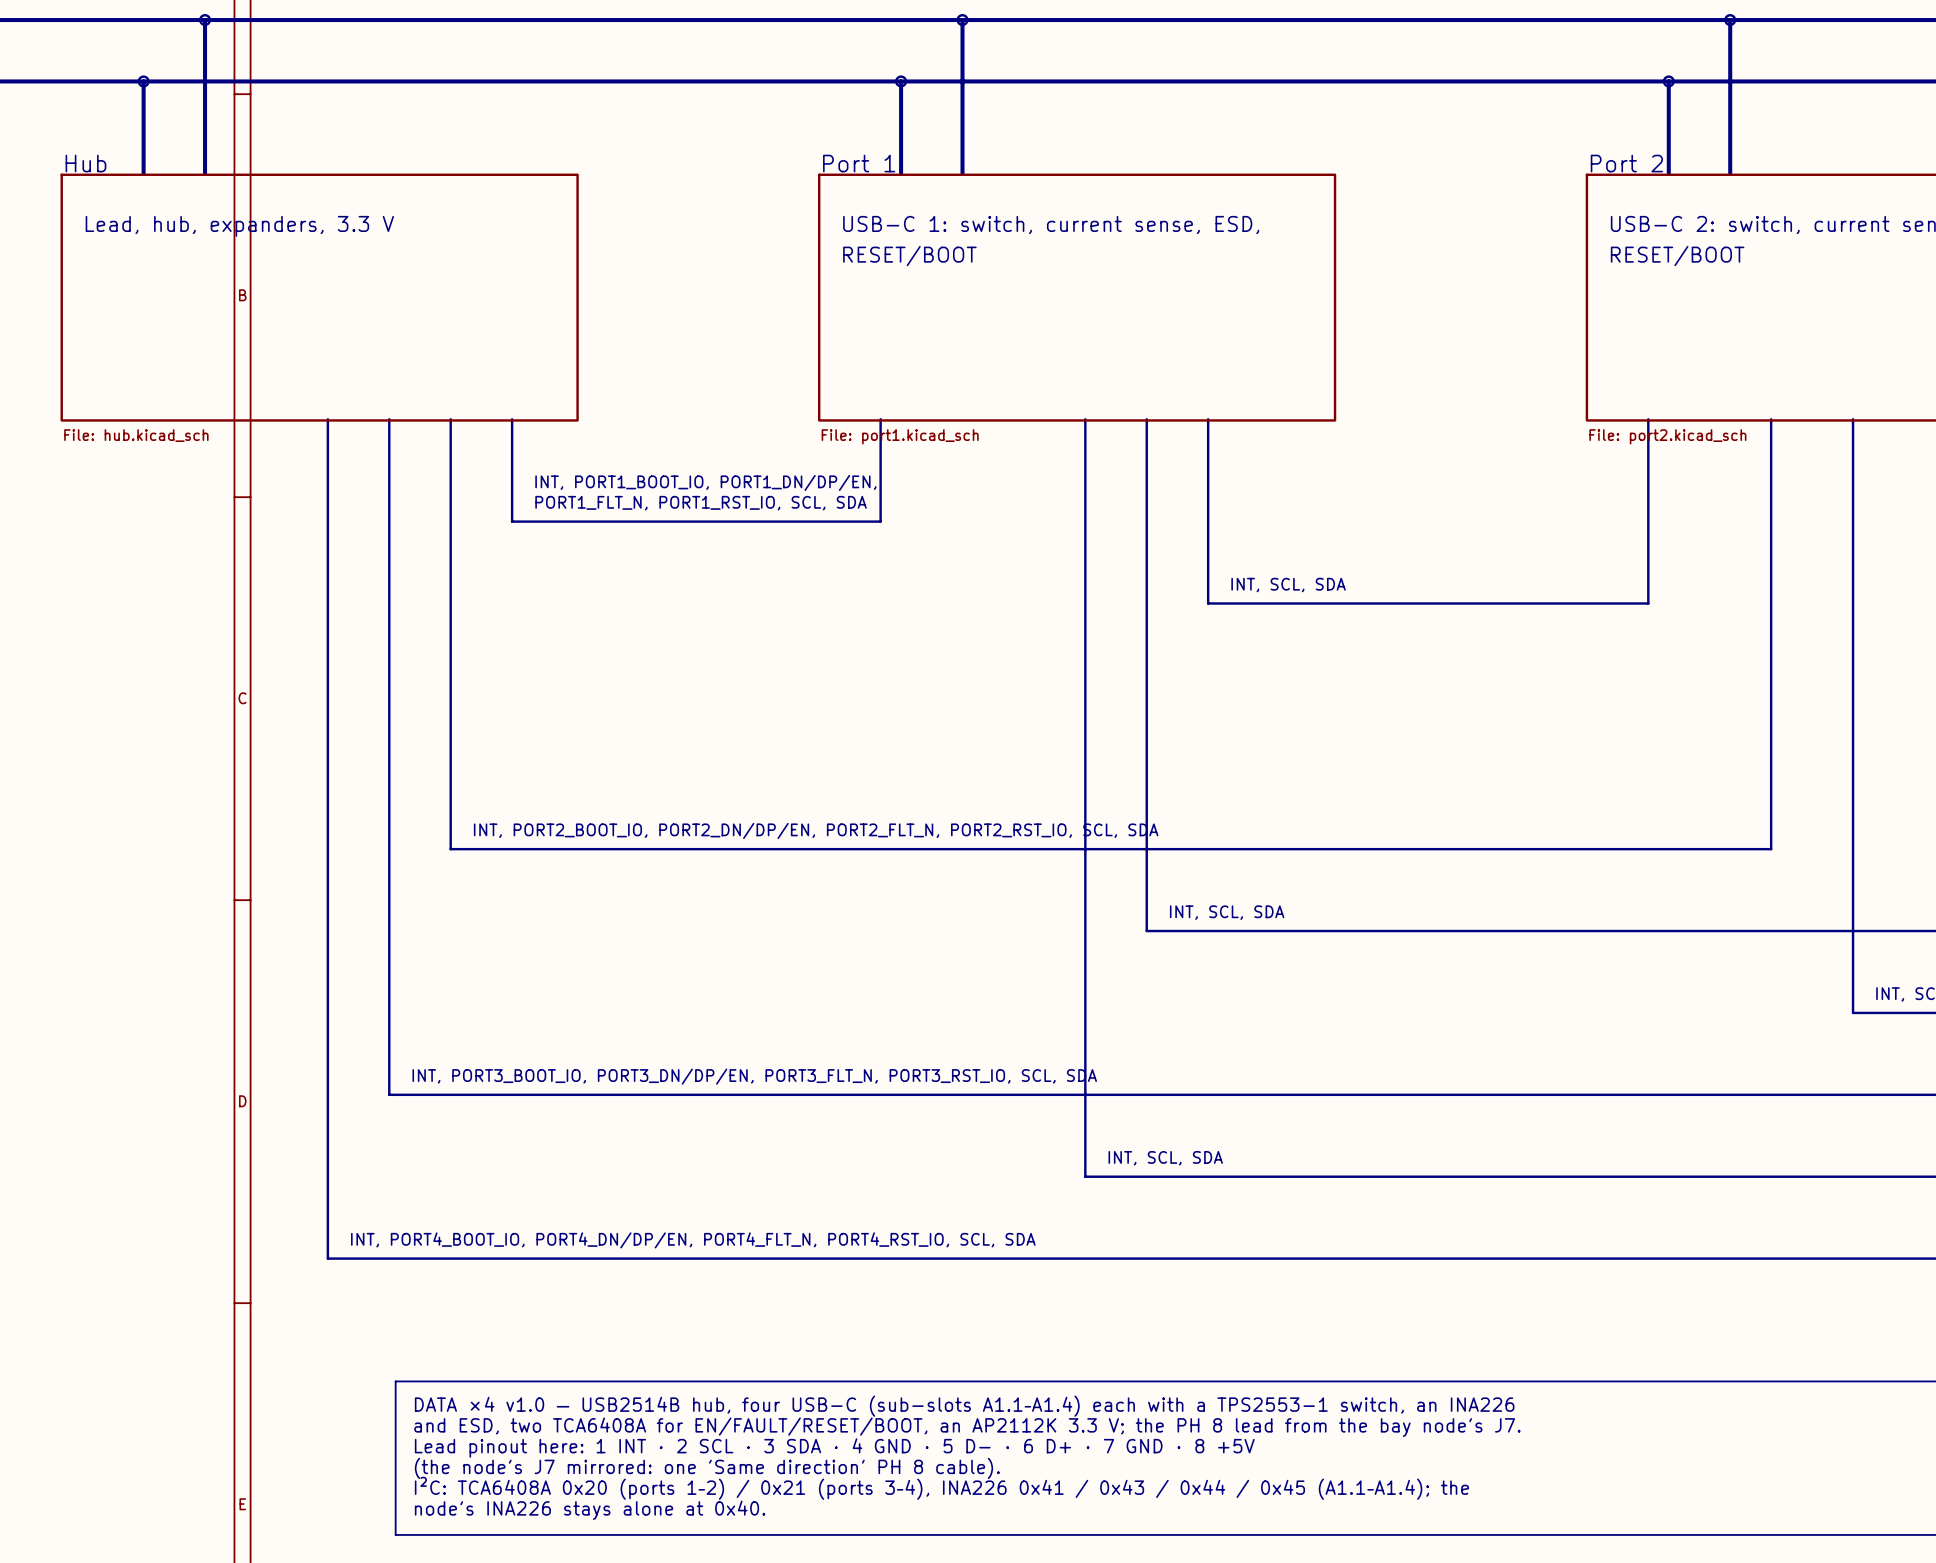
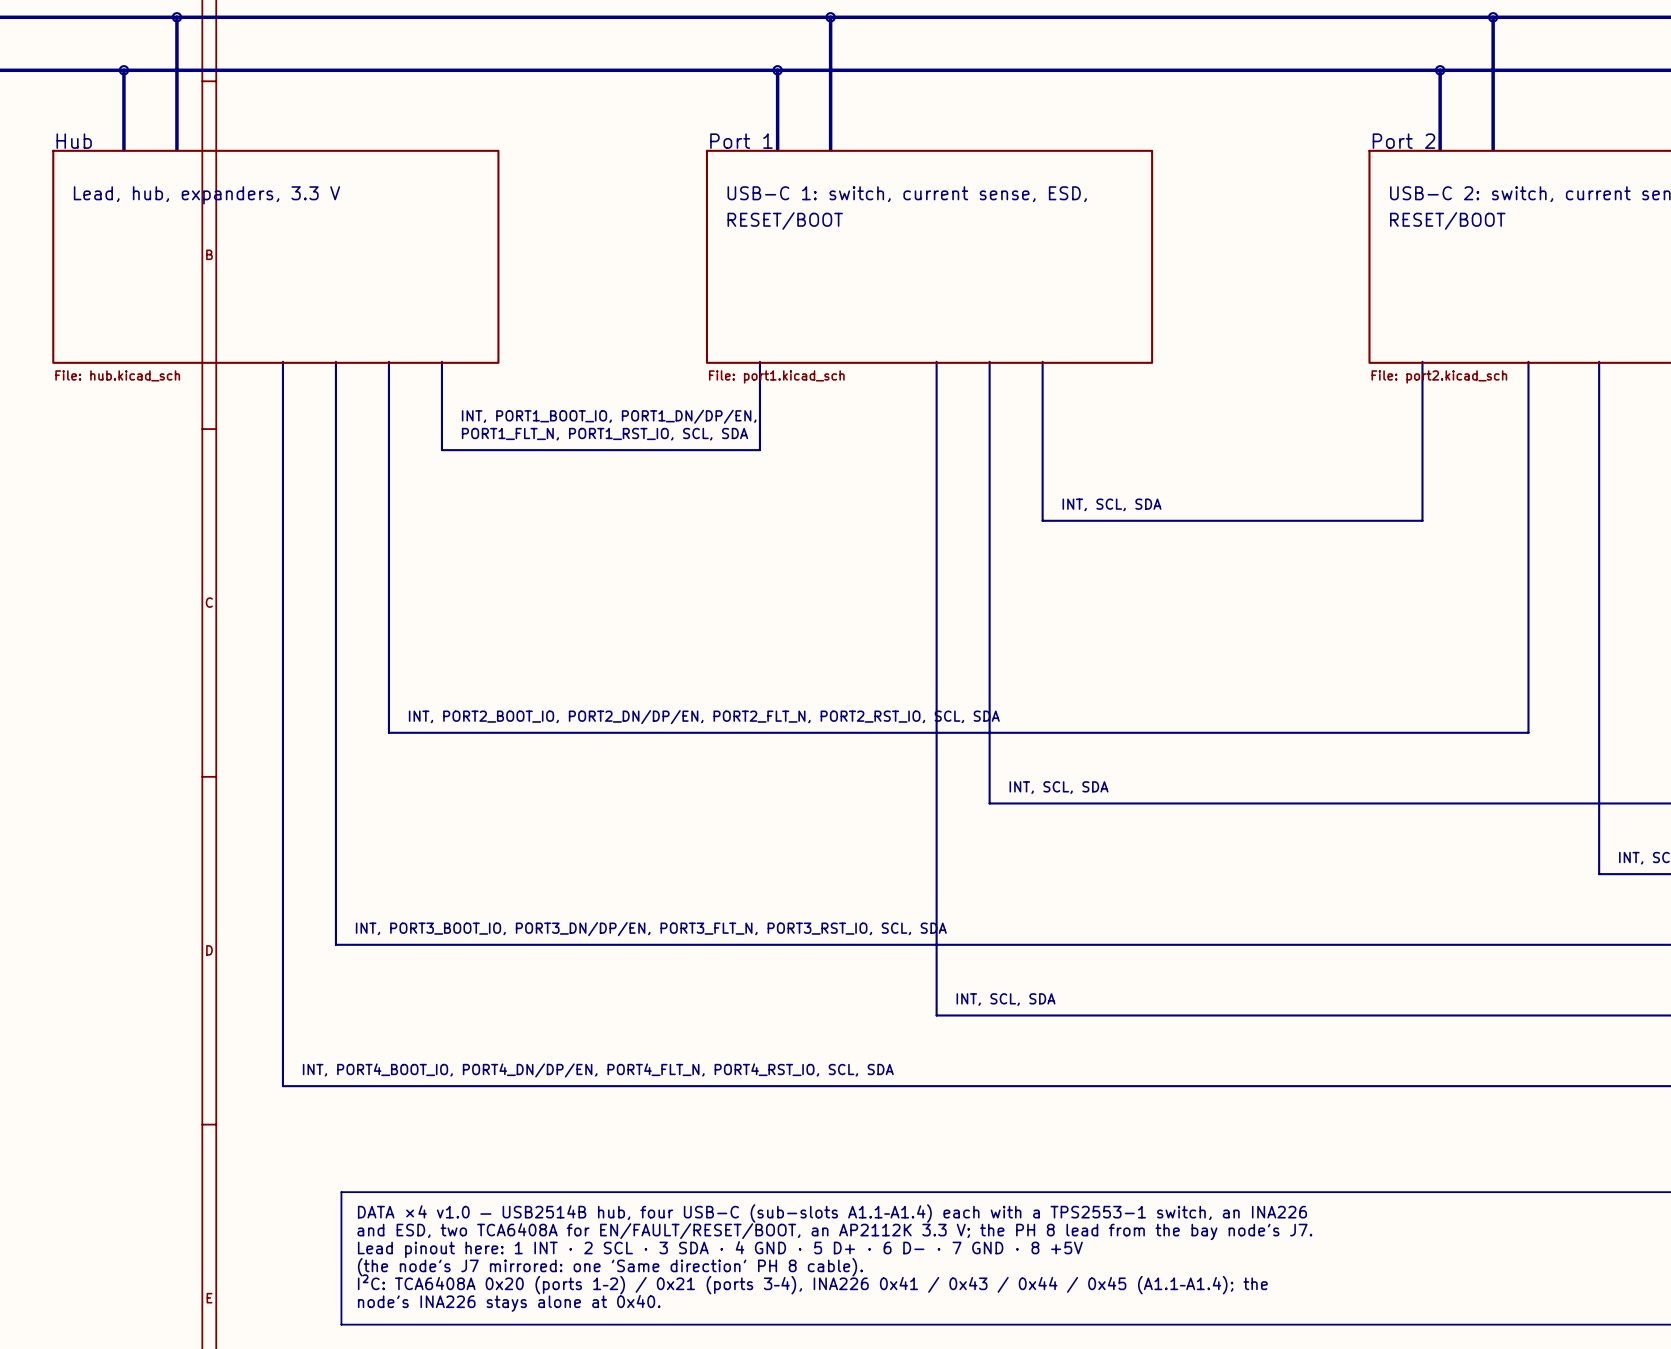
text: Lead pinout here: 1 INT · 2 SCL · 3 SDA · 4 GND · 5 D− · 6 D+ · 7 GND · 8 +5V (834, 1447) -> Lead pinout here: 1 INT · 2 SCL · 3 SDA · 4 GND · 5 D+ · 6 D− · 7 GND · 8 +5V (720, 1249)

